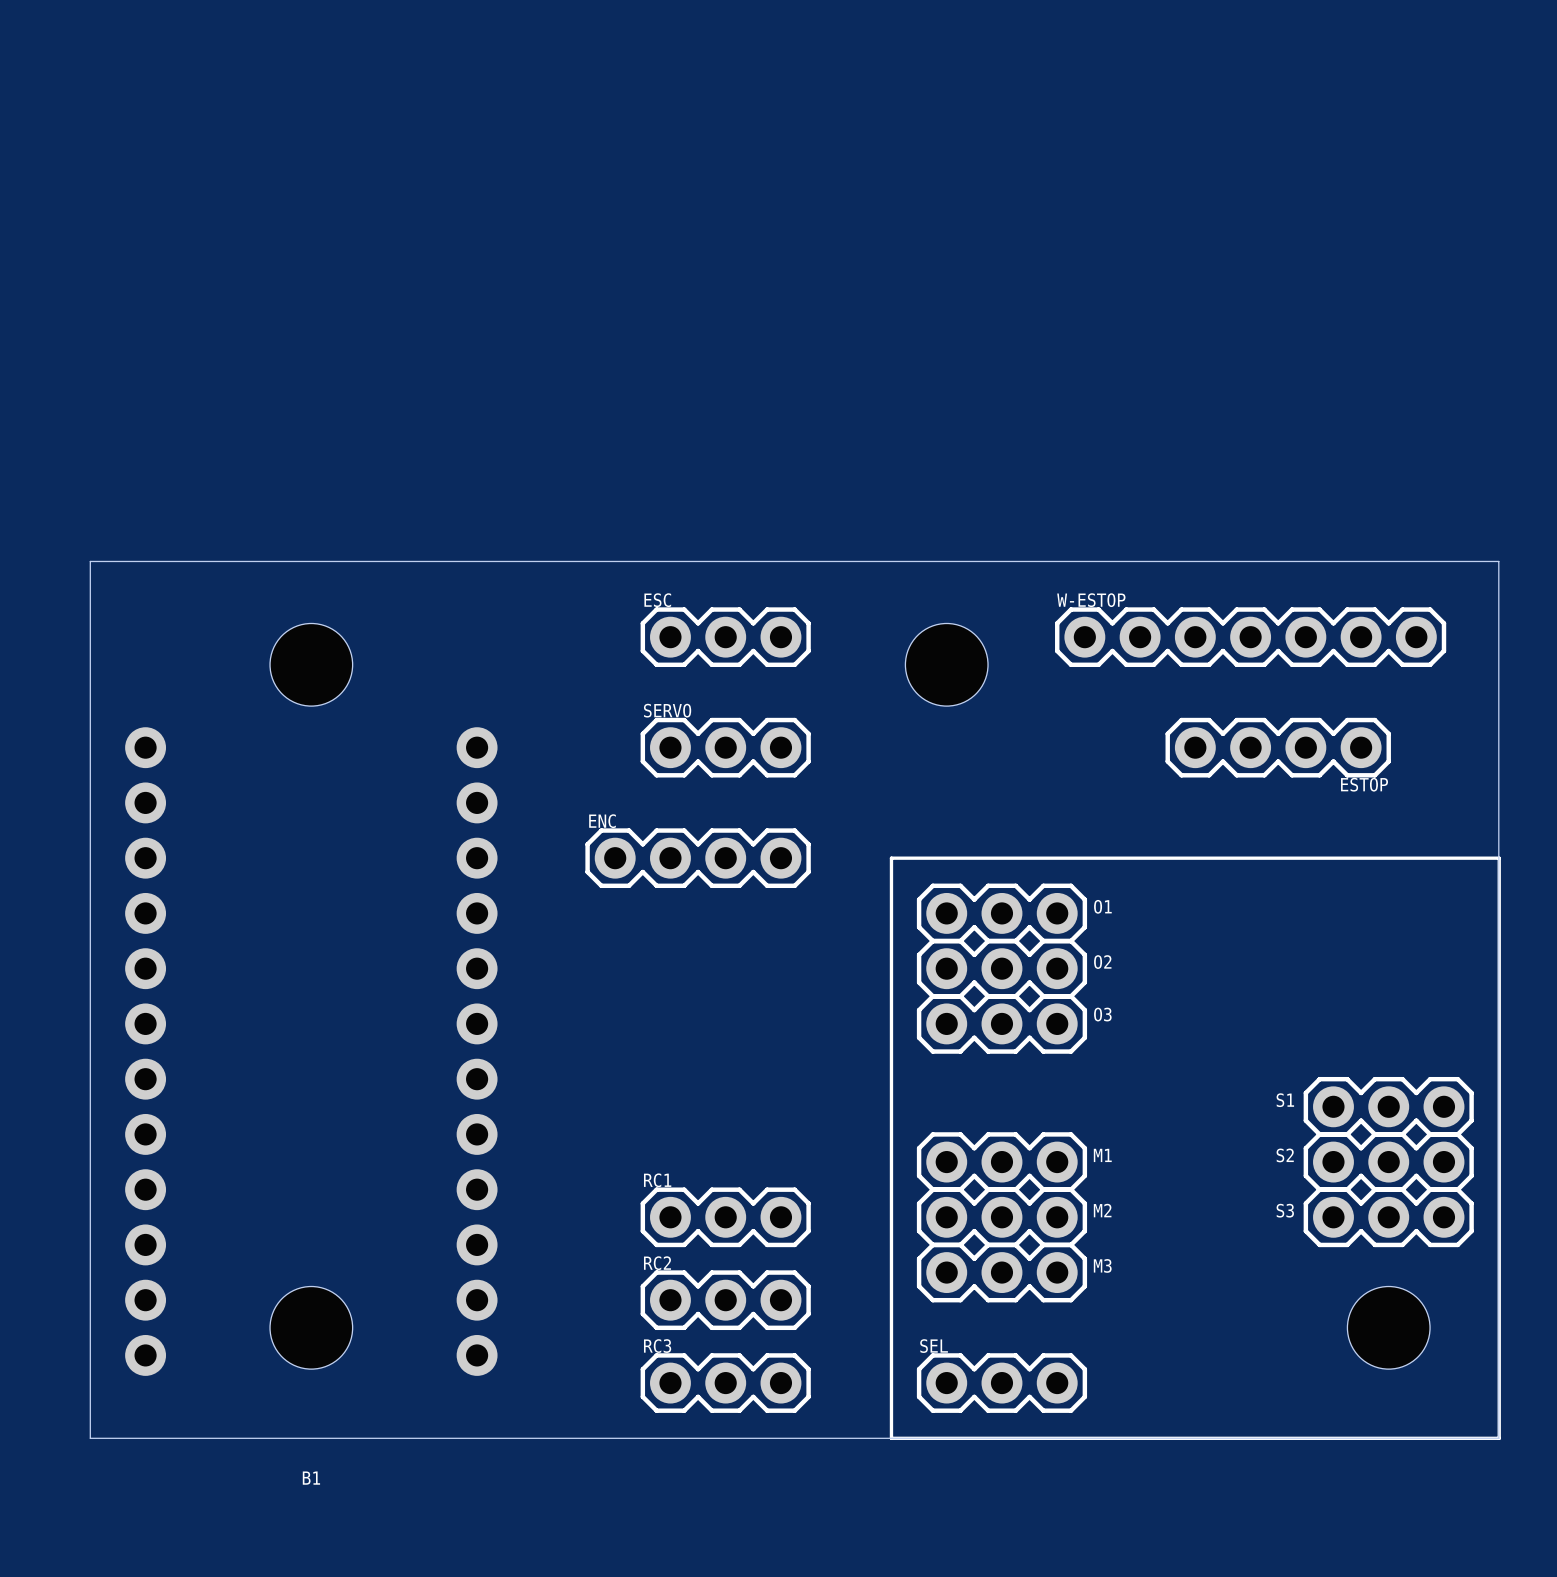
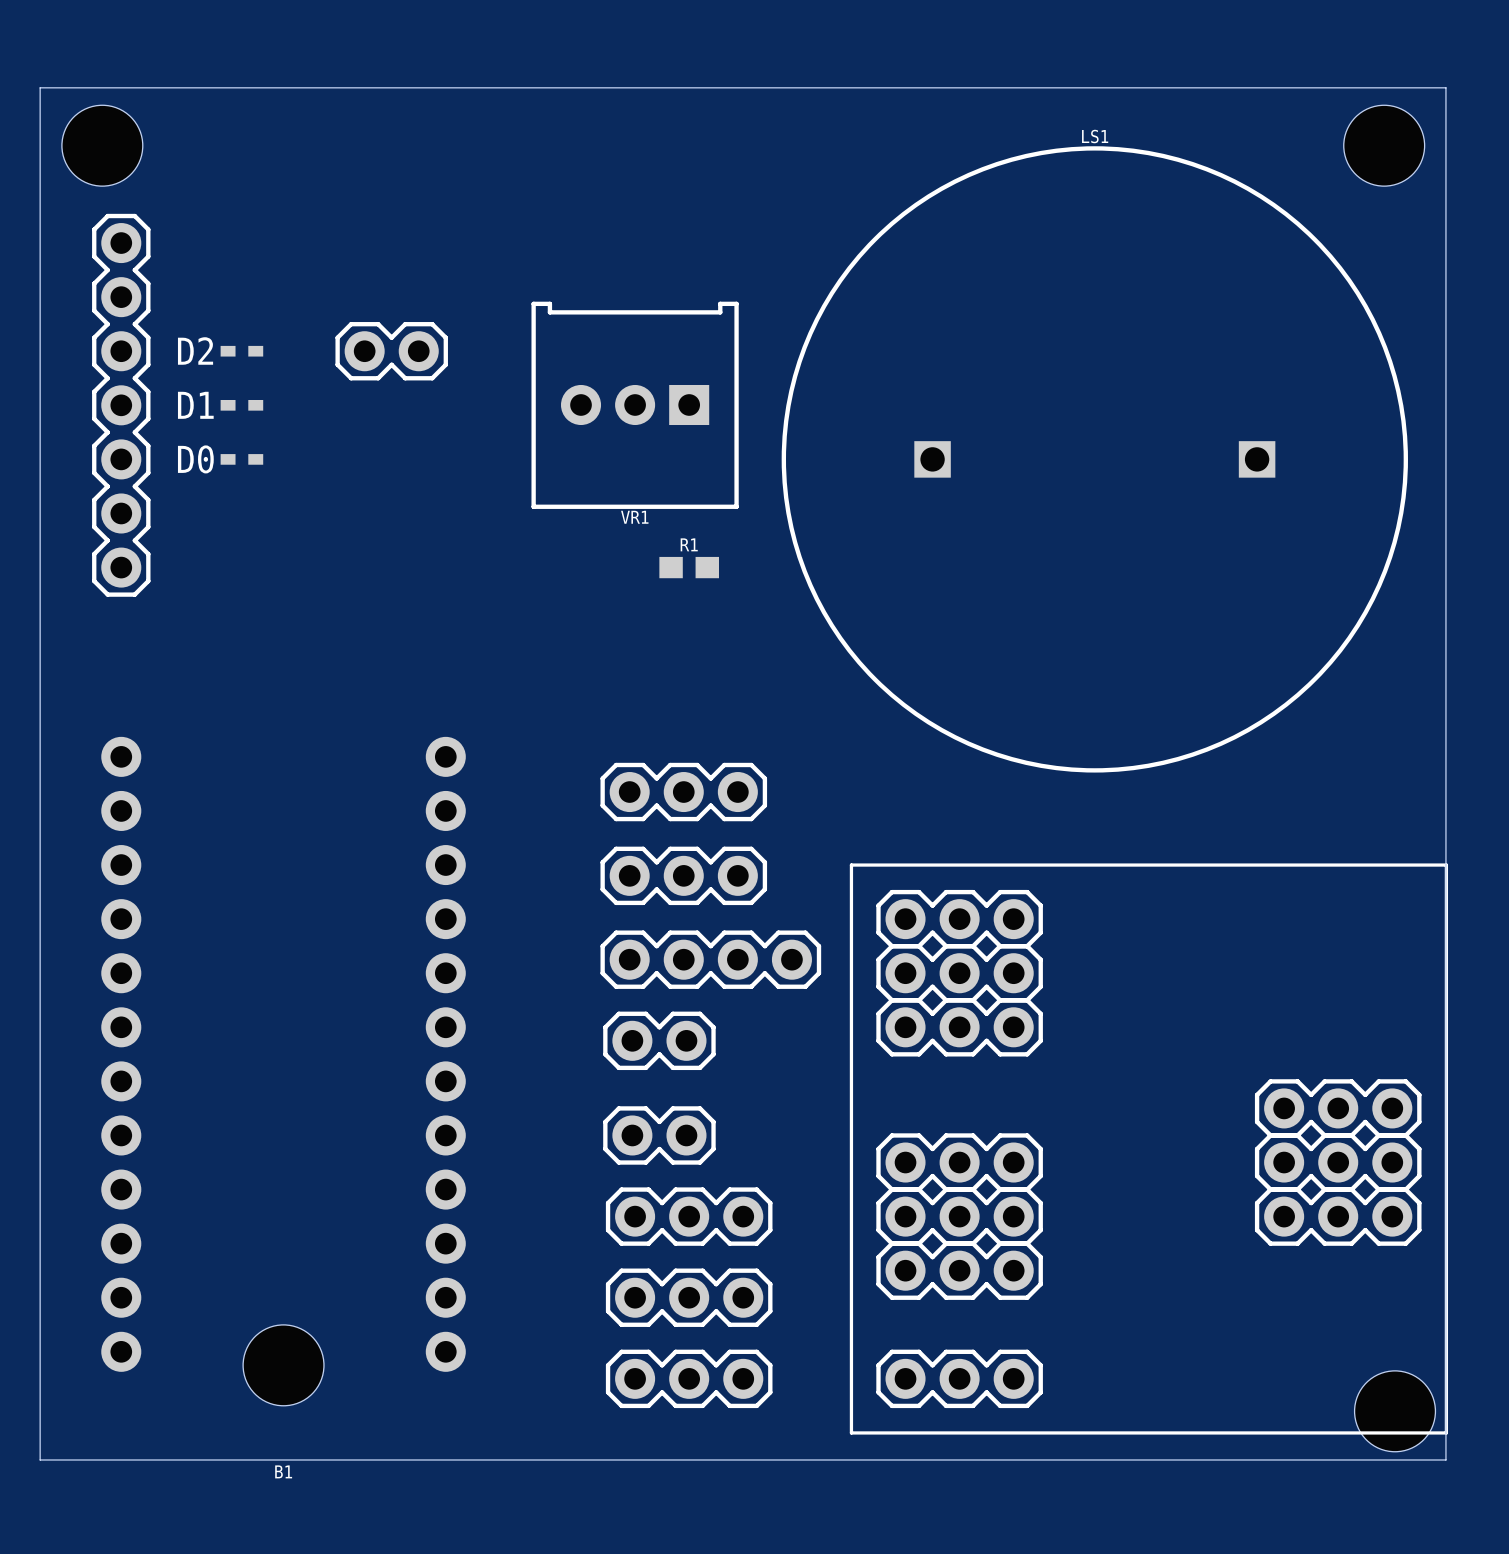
hole: none -> (102, 145)
hole: none -> (1384, 145)
D2: none -> (241, 351)
part: none -> (391, 351)
part: none -> (121, 405)
D1: none -> (241, 405)
VR1: none -> (635, 405)
D0: none -> (241, 459)
LS1: none -> (1094, 459)
R1: none -> (689, 567)
board edge: (1498, 561) (90, 561) (90, 1438) (1498, 1438) -> (1445, 574) (1445, 87) (40, 87) (40, 1459) (1445, 1459) (1445, 1432)
ESC: (725, 637) -> none
W-ESTOP: (1250, 637) -> none
hole: (311, 664) -> none
hole: (946, 664) -> none
SERVO: (725, 747) -> none
ESTOP: (1278, 747) -> none
part: none -> (683, 792)
ENC: (698, 858) -> none
part: none -> (683, 875)
O1 name: O1 (1102, 906) -> none
part: none -> (710, 959)
O2 name: O2 (1102, 962) -> none
O3 name: O3 (1102, 1014) -> none
part: none -> (659, 1040)
S1 name: S1 (1285, 1100) -> none
part: none -> (659, 1135)
M1 name: M1 (1102, 1155) -> none
S2 name: S2 (1285, 1155) -> none
RC1 name: RC1 (657, 1180) -> none
M2 name: M2 (1102, 1210) -> none
S3 name: S3 (1285, 1210) -> none
RC2 name: RC2 (657, 1263) -> none
M3 name: M3 (1102, 1265) -> none
hole position: (311, 1327) -> (283, 1365)
hole position: (1388, 1327) -> (1395, 1411)
RC3 name: RC3 (657, 1346) -> none
SEL name: SEL (934, 1346) -> none

